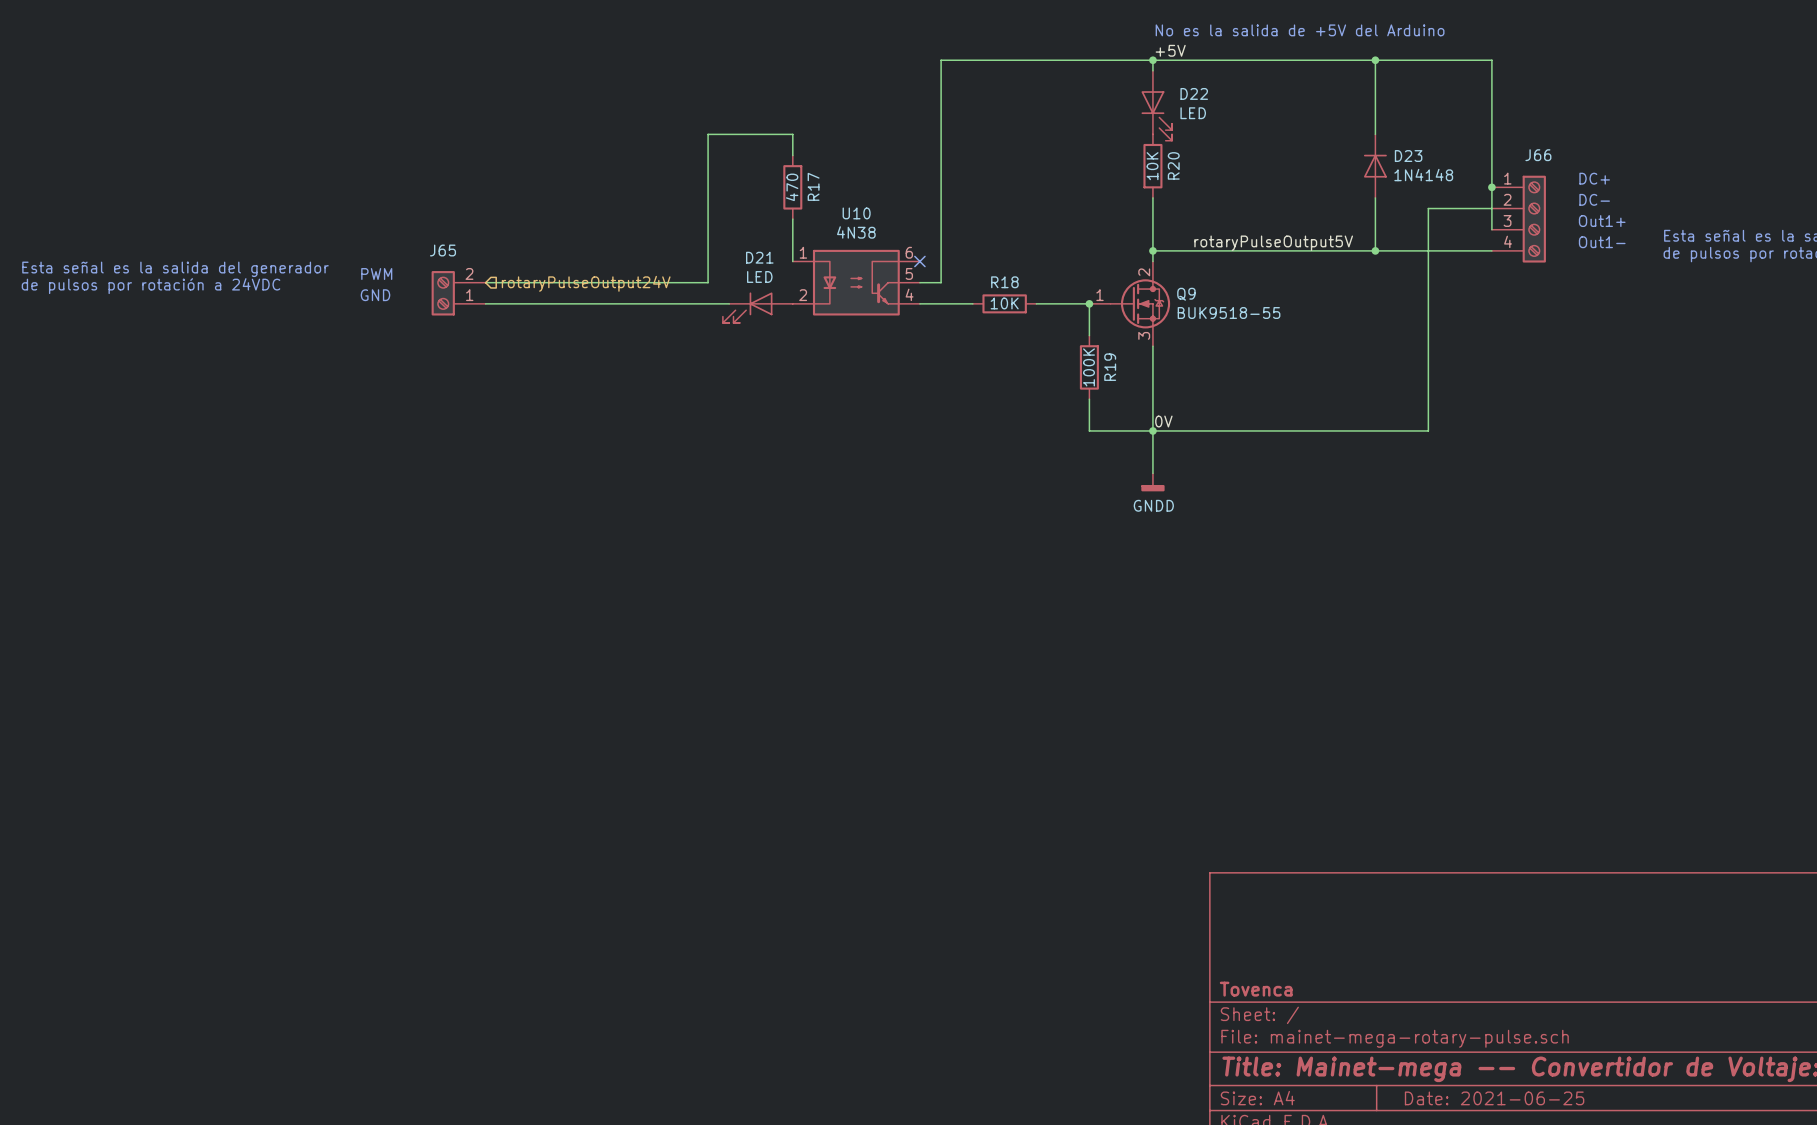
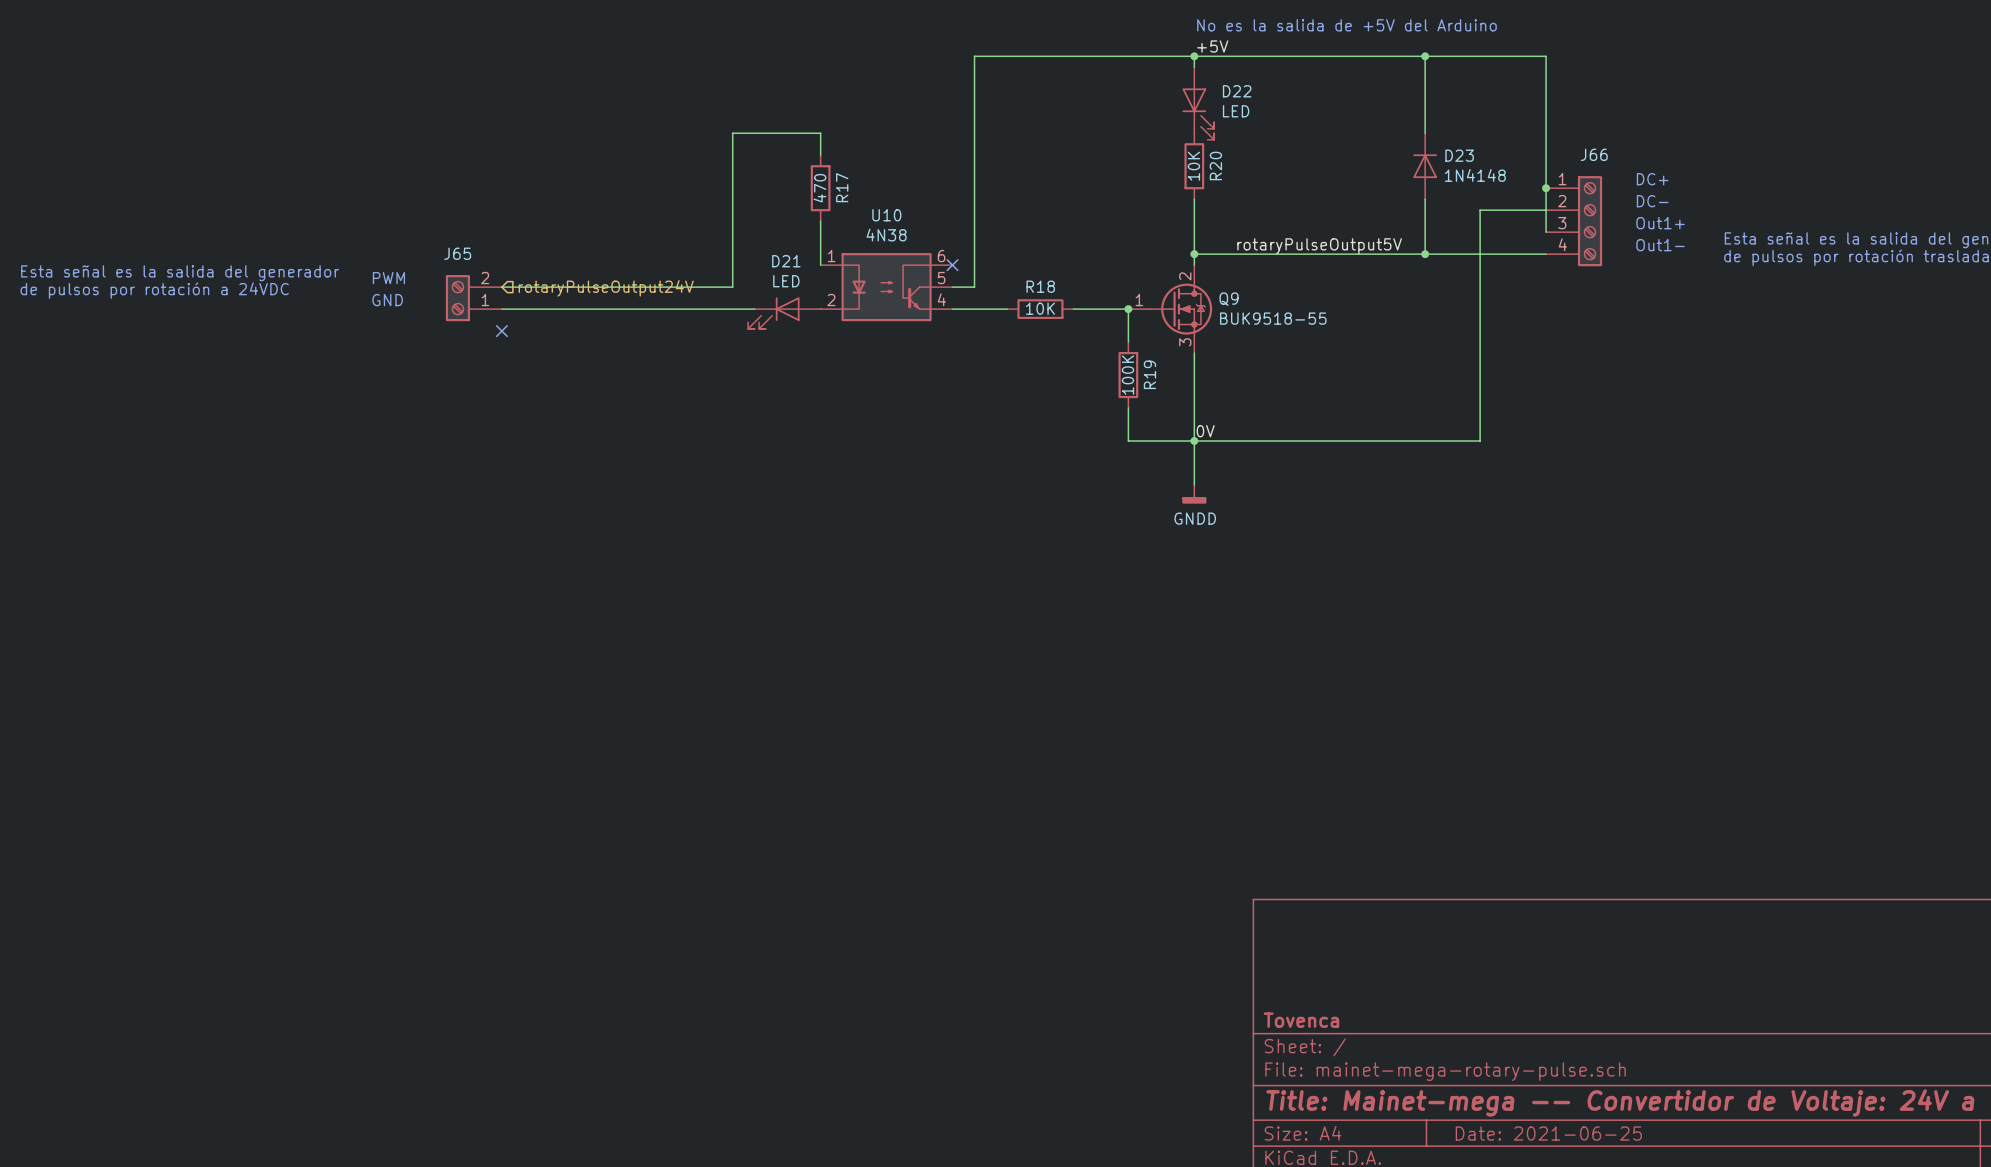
no-connect mark: none -> (501, 331)

